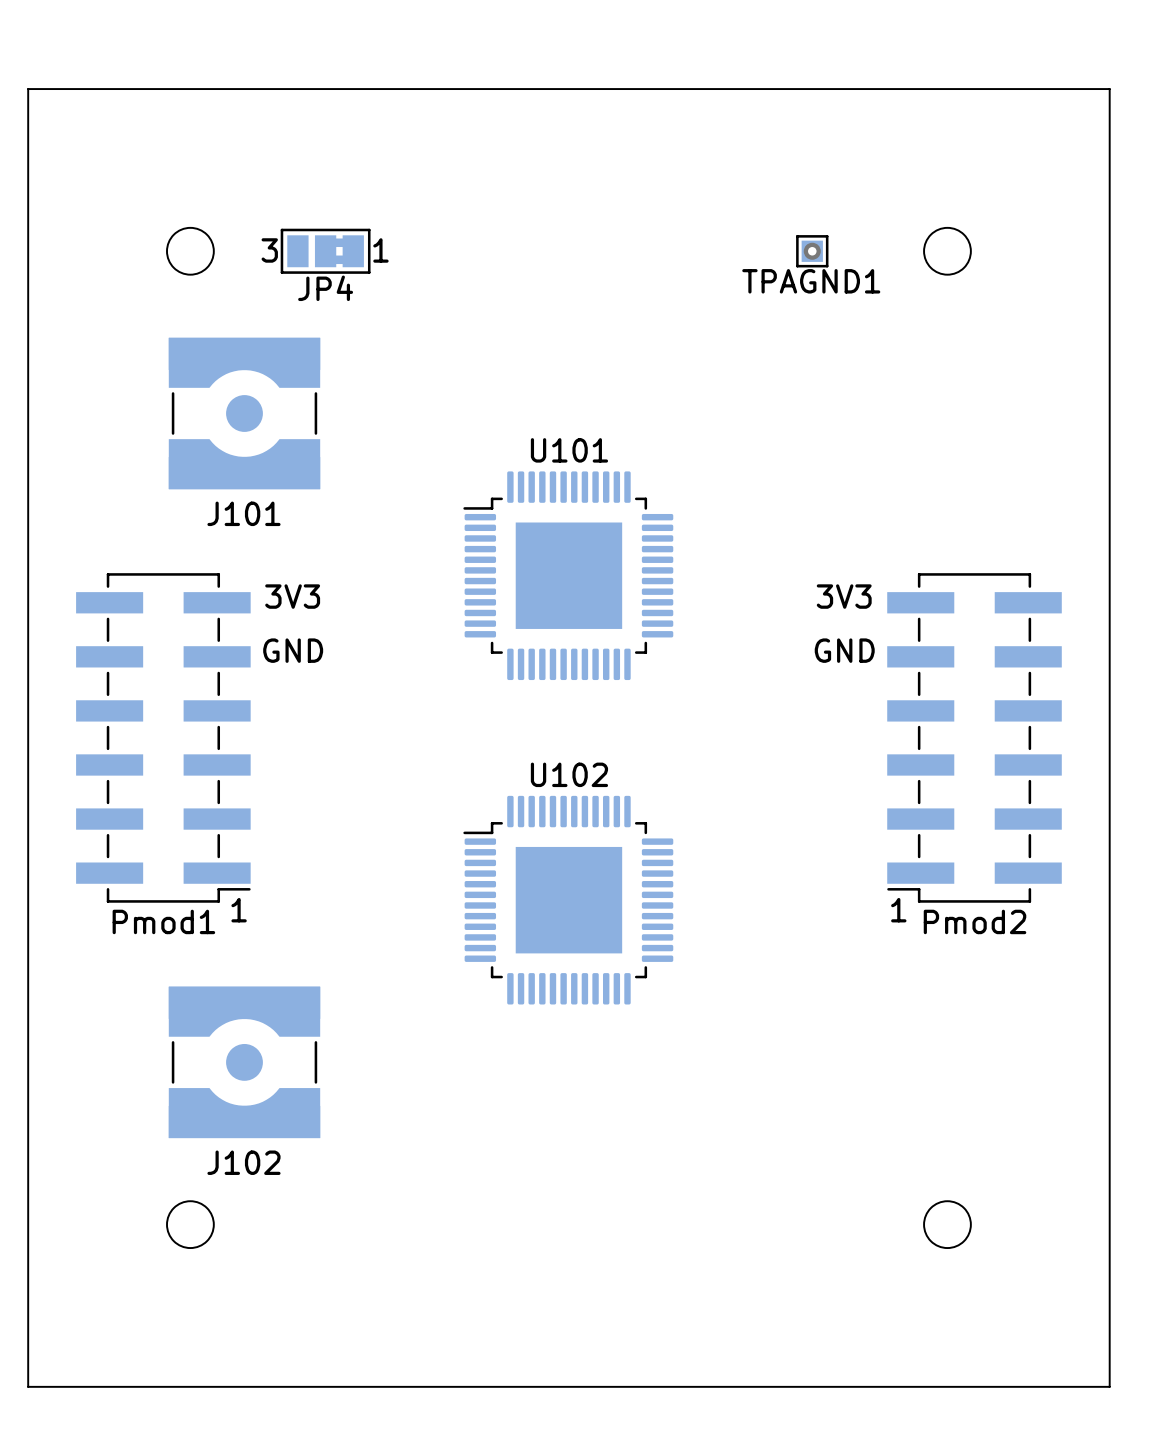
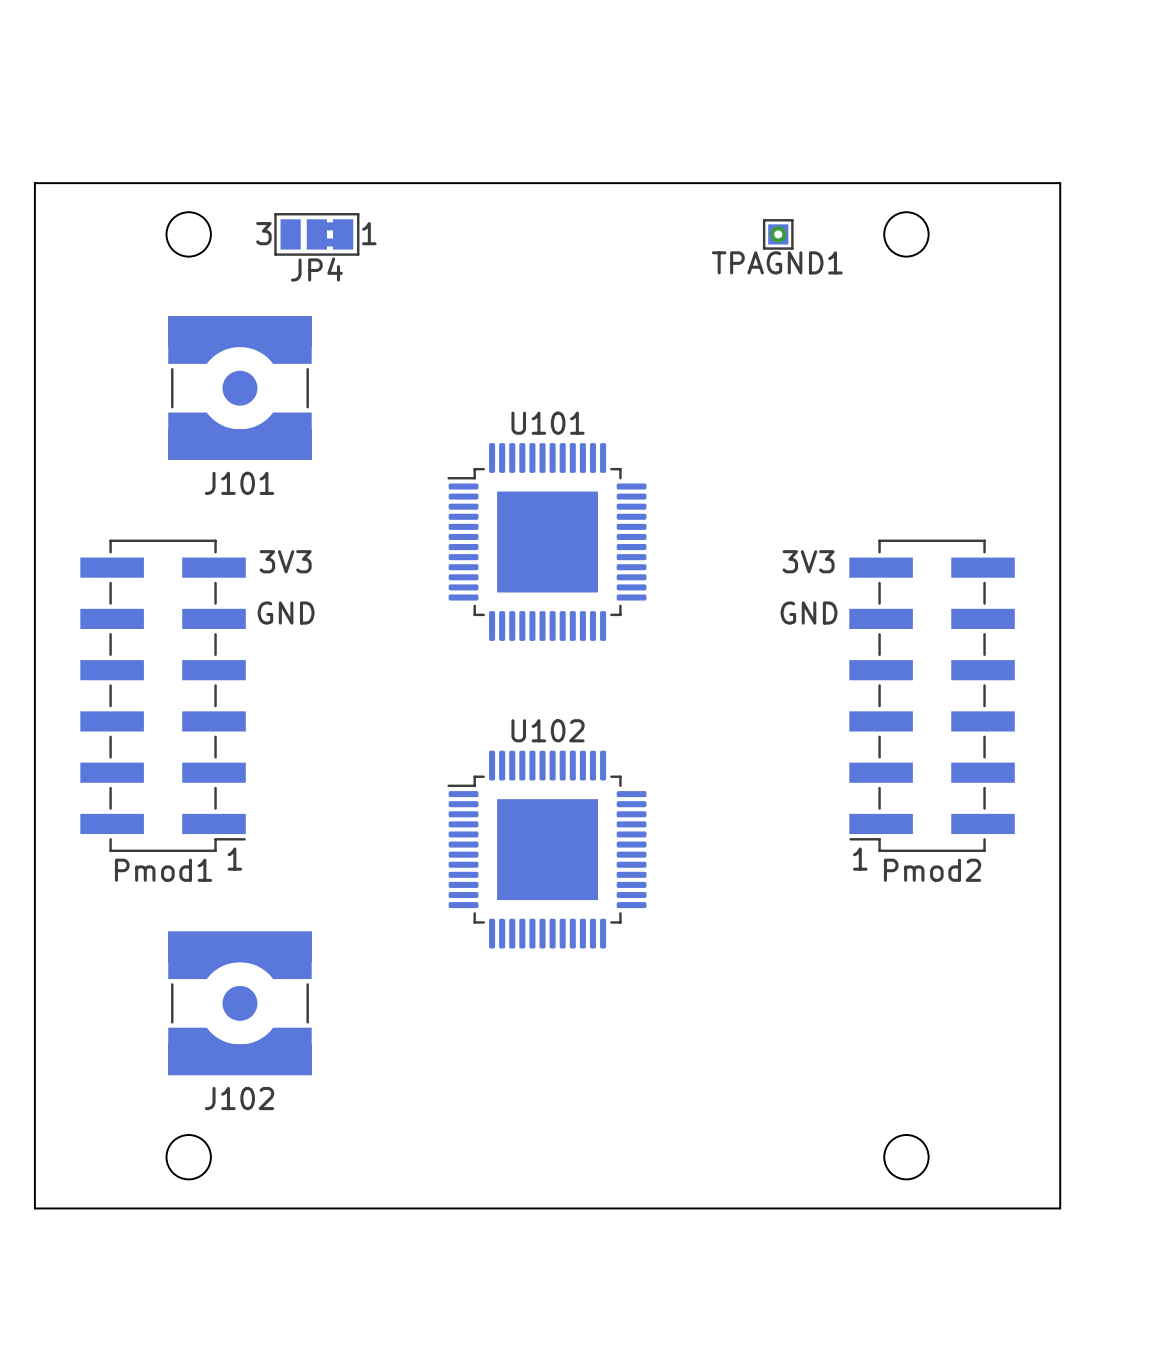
board edge: (1109, 197) (1109, 89) (28, 89) (28, 197) -> (1060, 183) (34, 183)
board edge: (1109, 1278) (1109, 1386) (28, 1386) (28, 1278) -> (1060, 1208) (34, 1208)

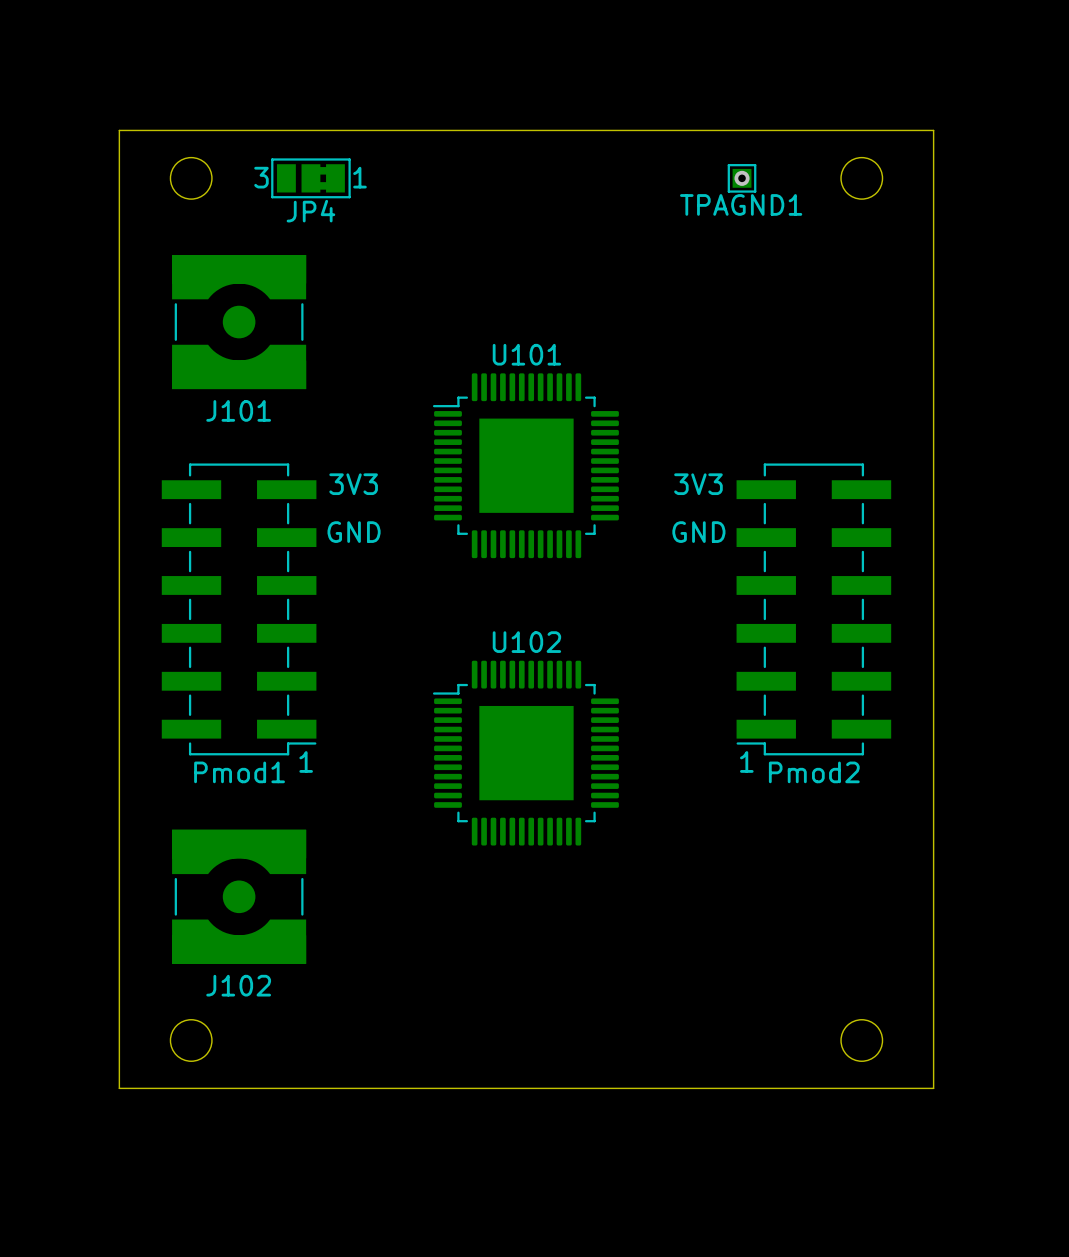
board edge: (111, 183) (34, 183) (34, 1208) (111, 1208) -> (119, 130) (119, 1088)
board edge: (983, 183) (1060, 183) (1060, 1208) (983, 1208) -> (933, 130) (933, 1088)
Pmod1 position: (163, 695) -> (239, 609)
Pmod2 position: (932, 695) -> (813, 609)

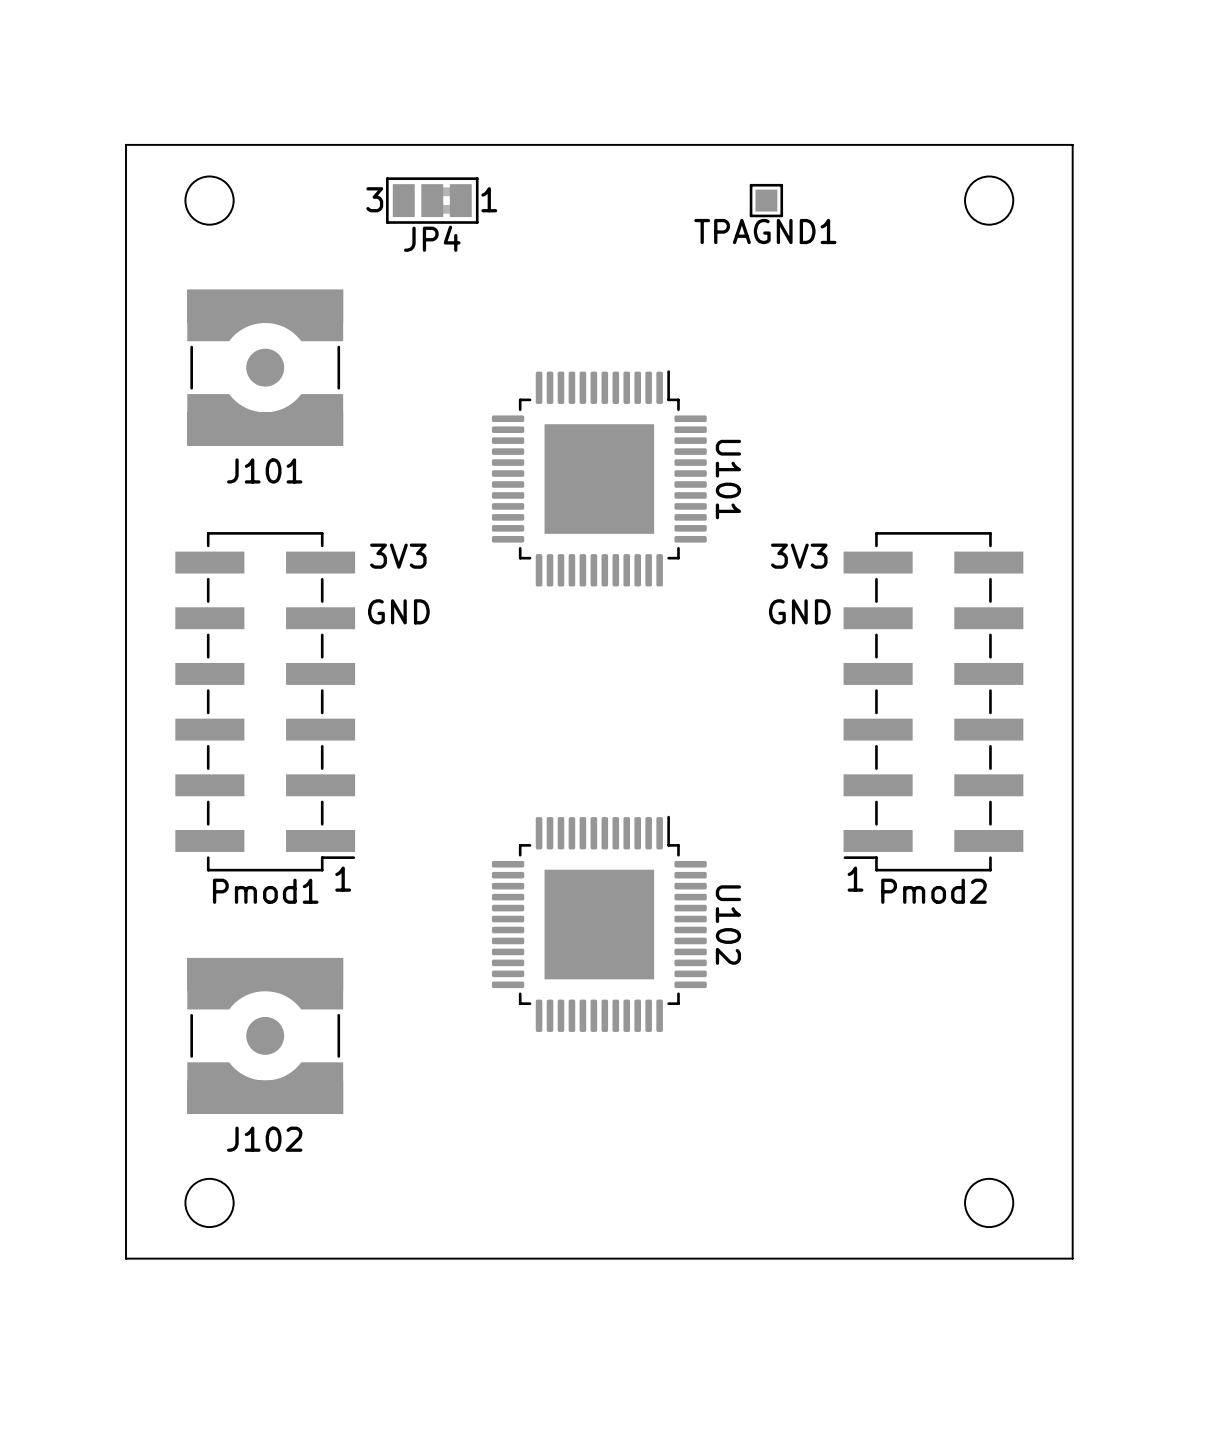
JP4 position: (310, 178) -> (432, 200)
TPAGND1 position: (742, 178) -> (766, 200)
via: (742, 178) -> none
U101 rotation: 0° (525, 465) -> 90° clockwise (599, 478)
U102 rotation: 0° (525, 753) -> 90° clockwise (599, 923)

